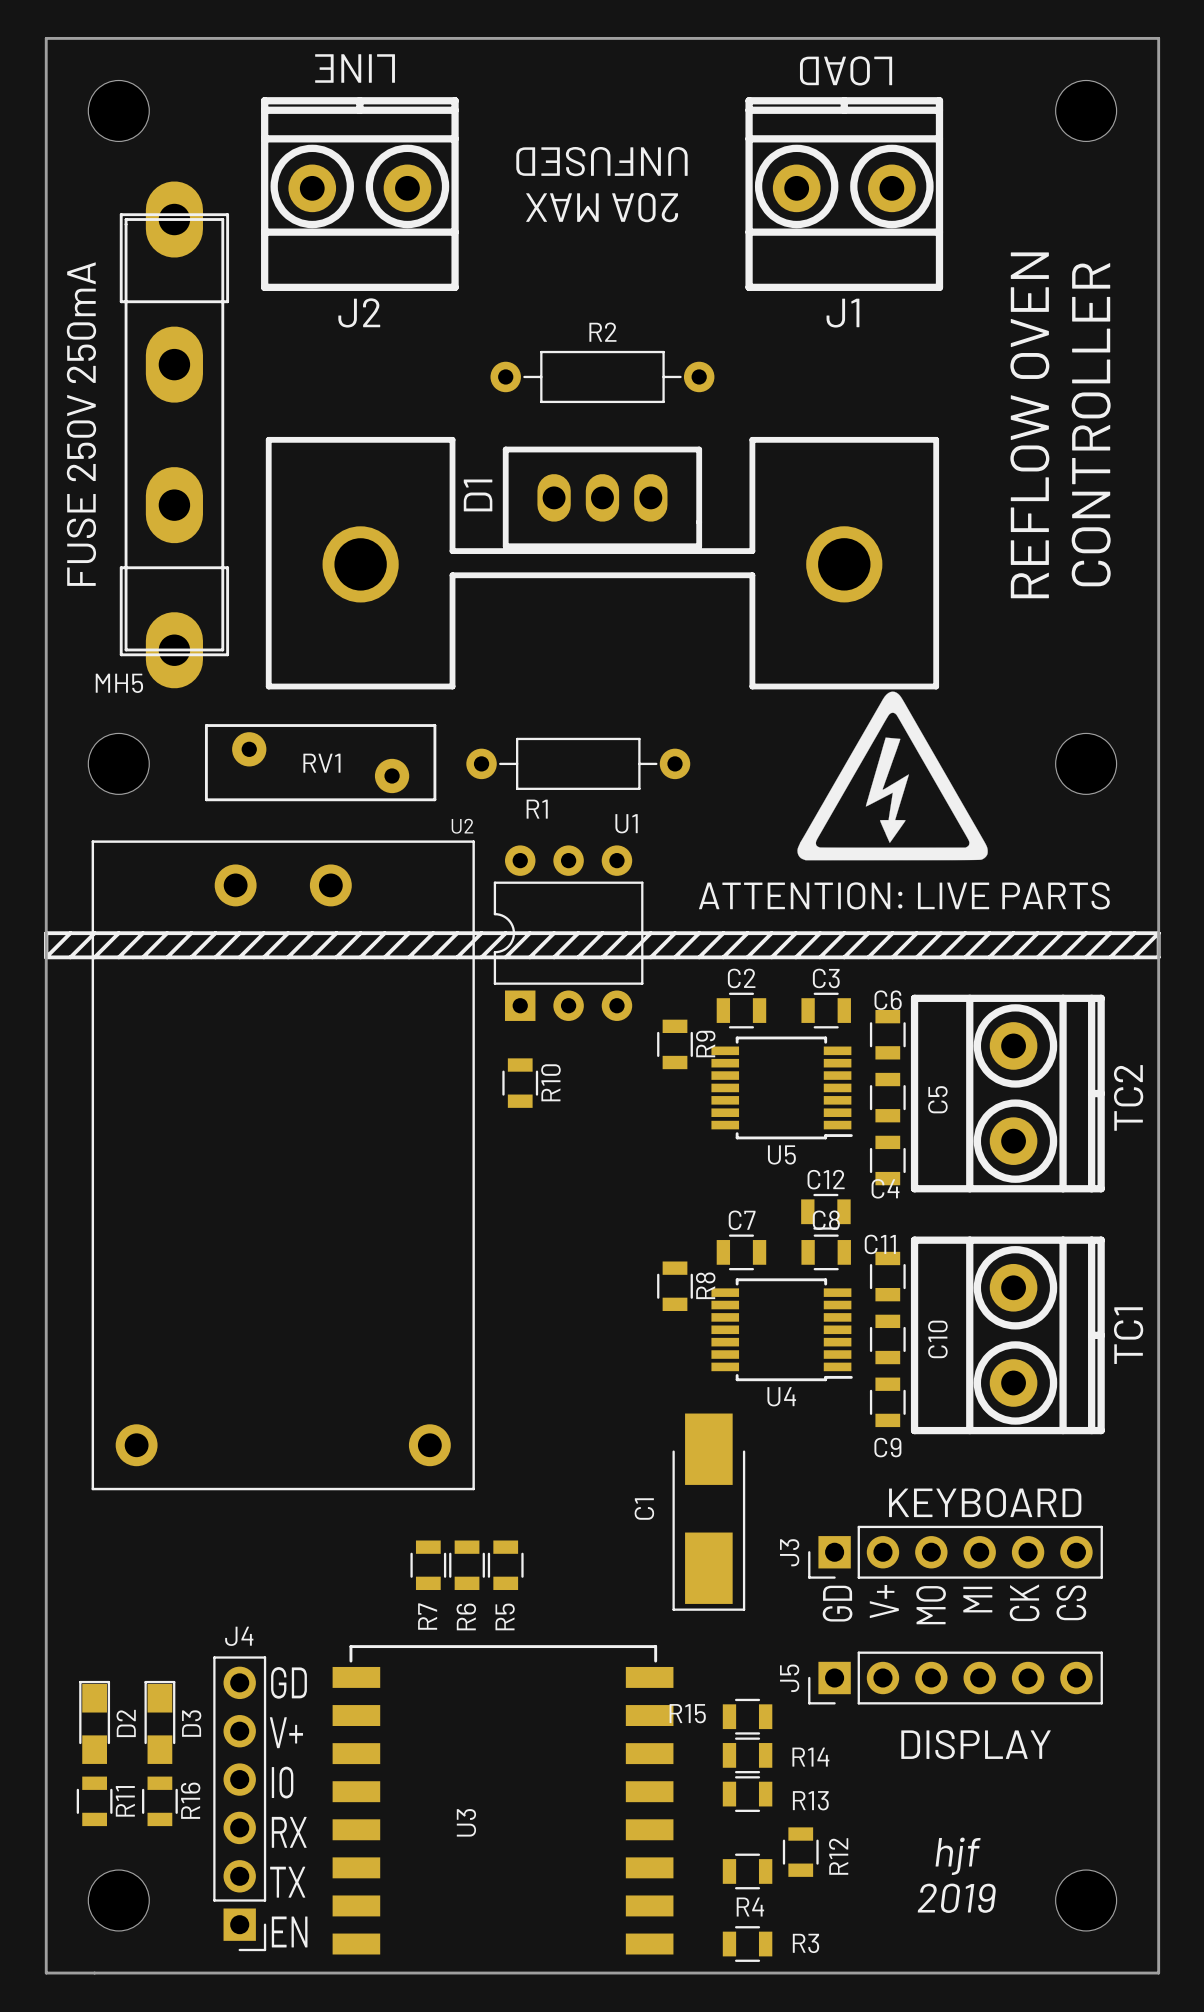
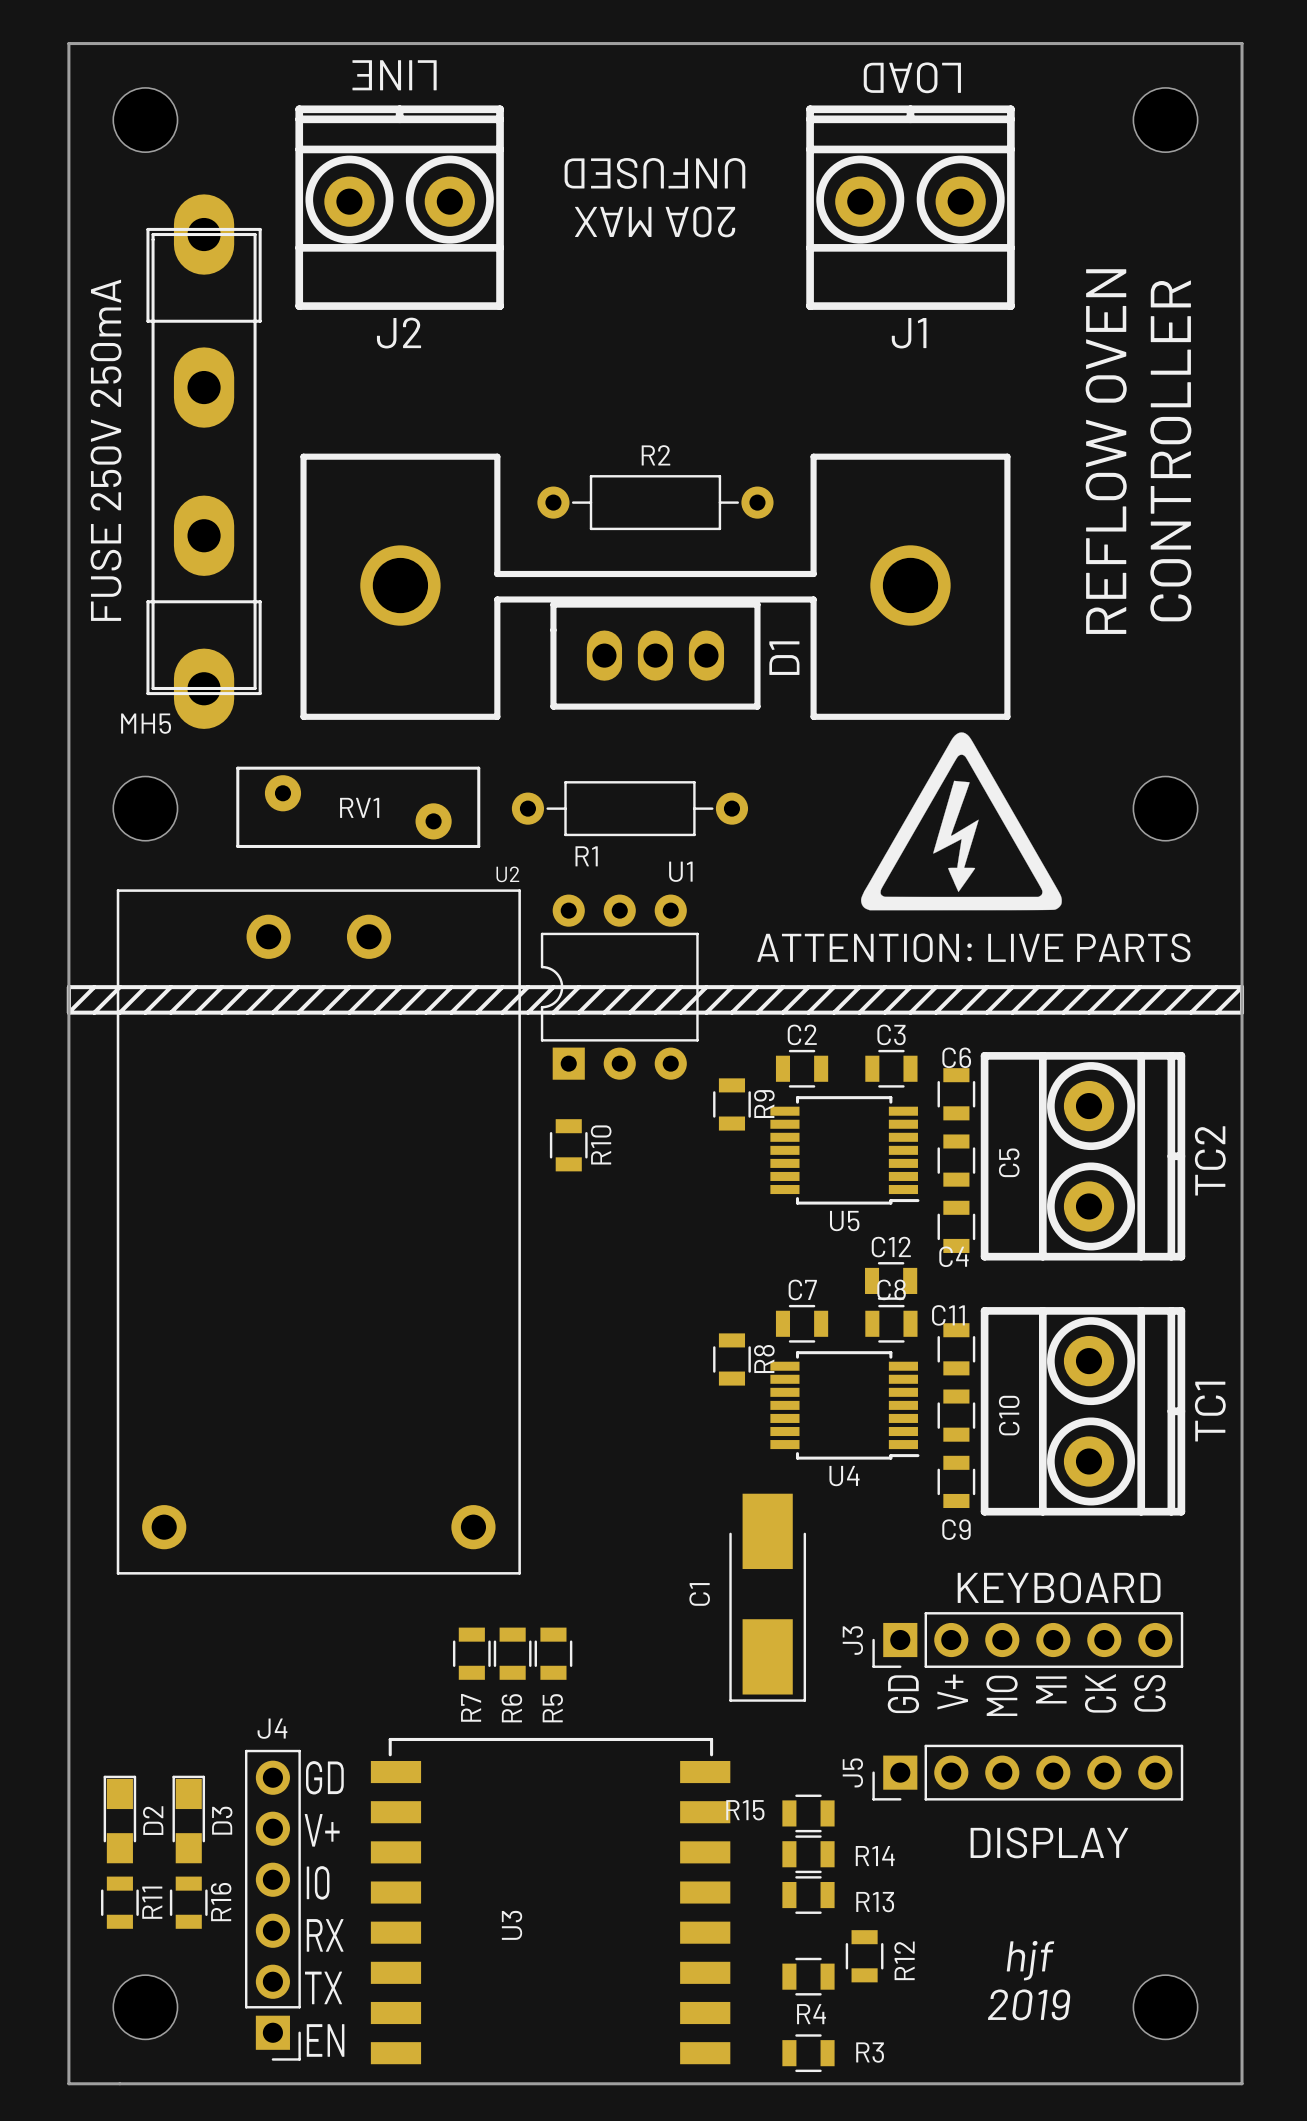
R2 position: (602, 376) -> (655, 502)
D1 rotation: 0° (602, 563) -> 180° (655, 586)

